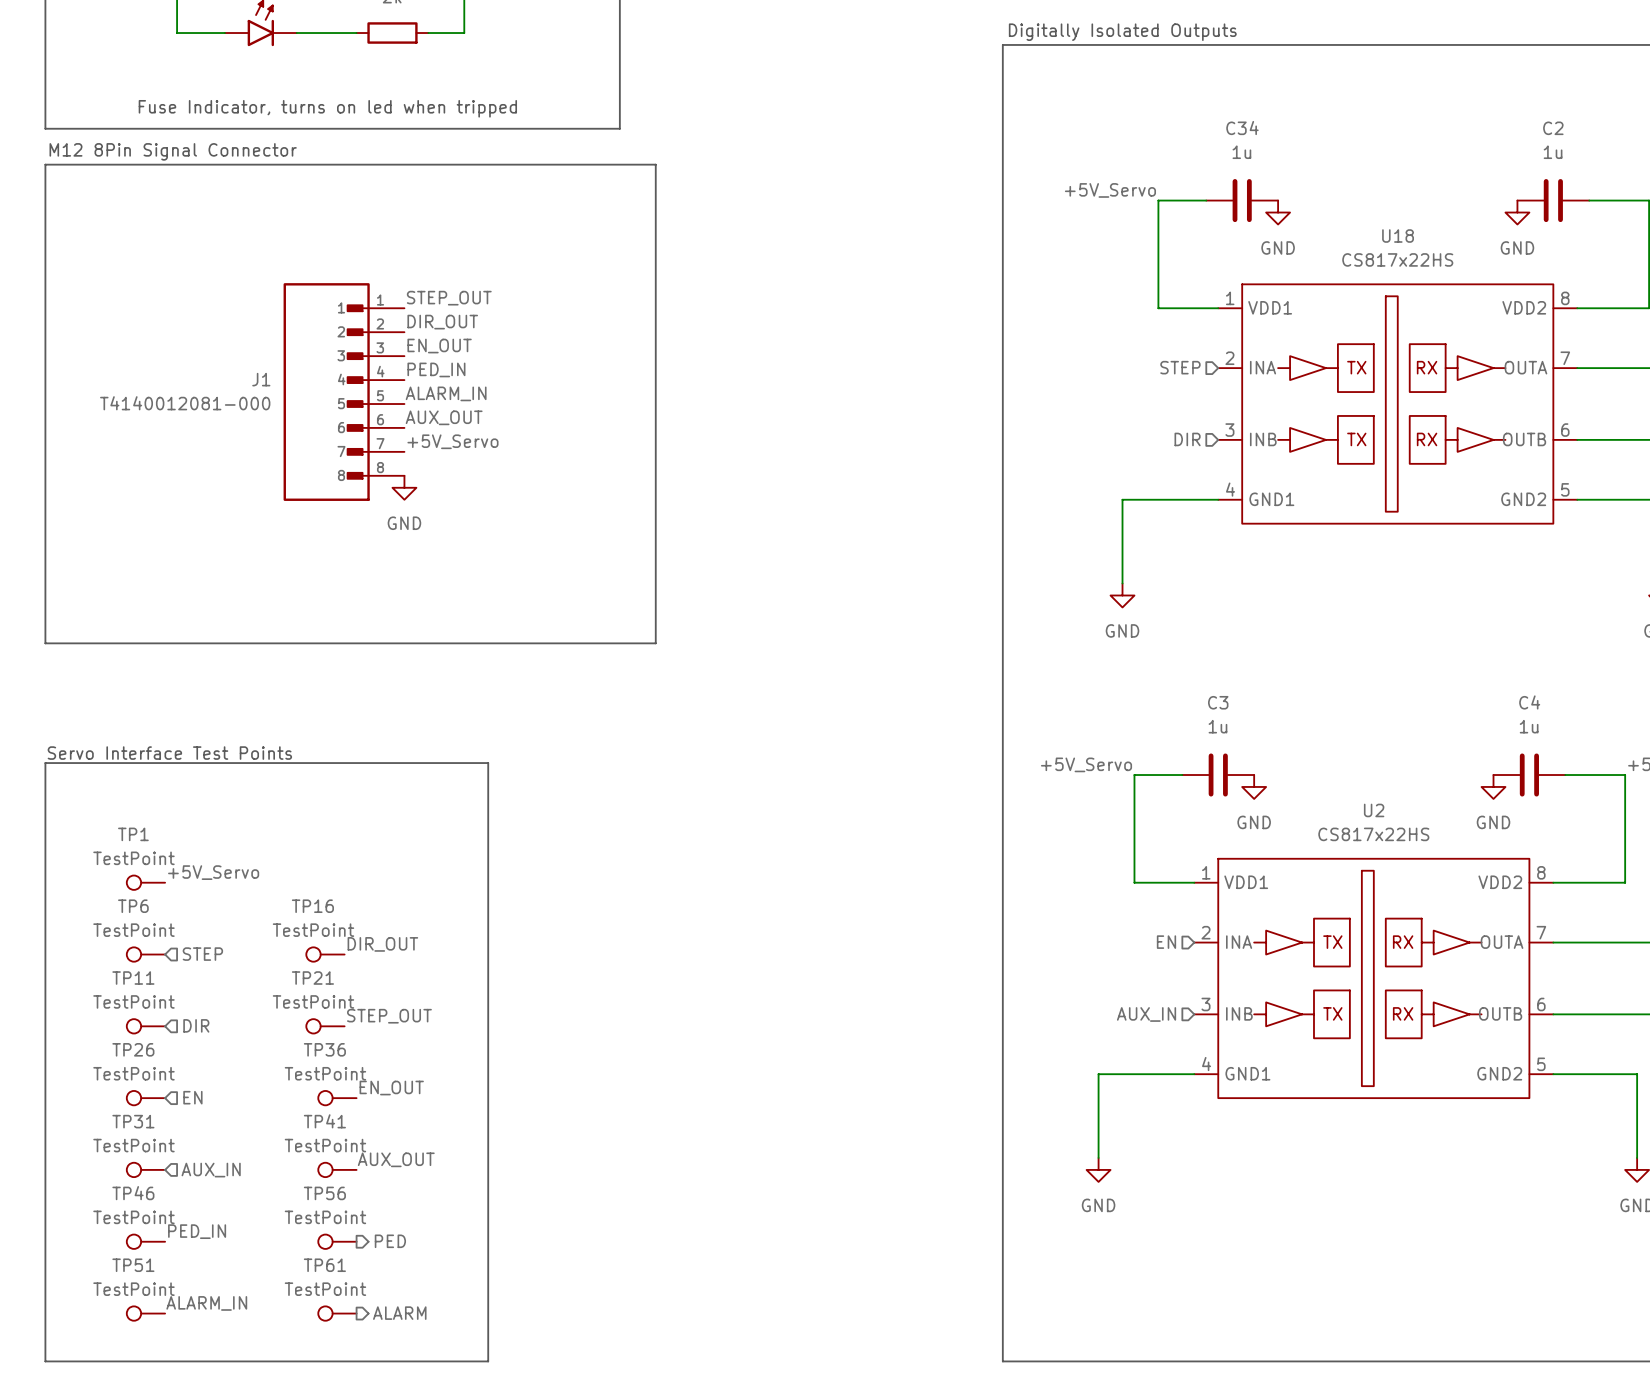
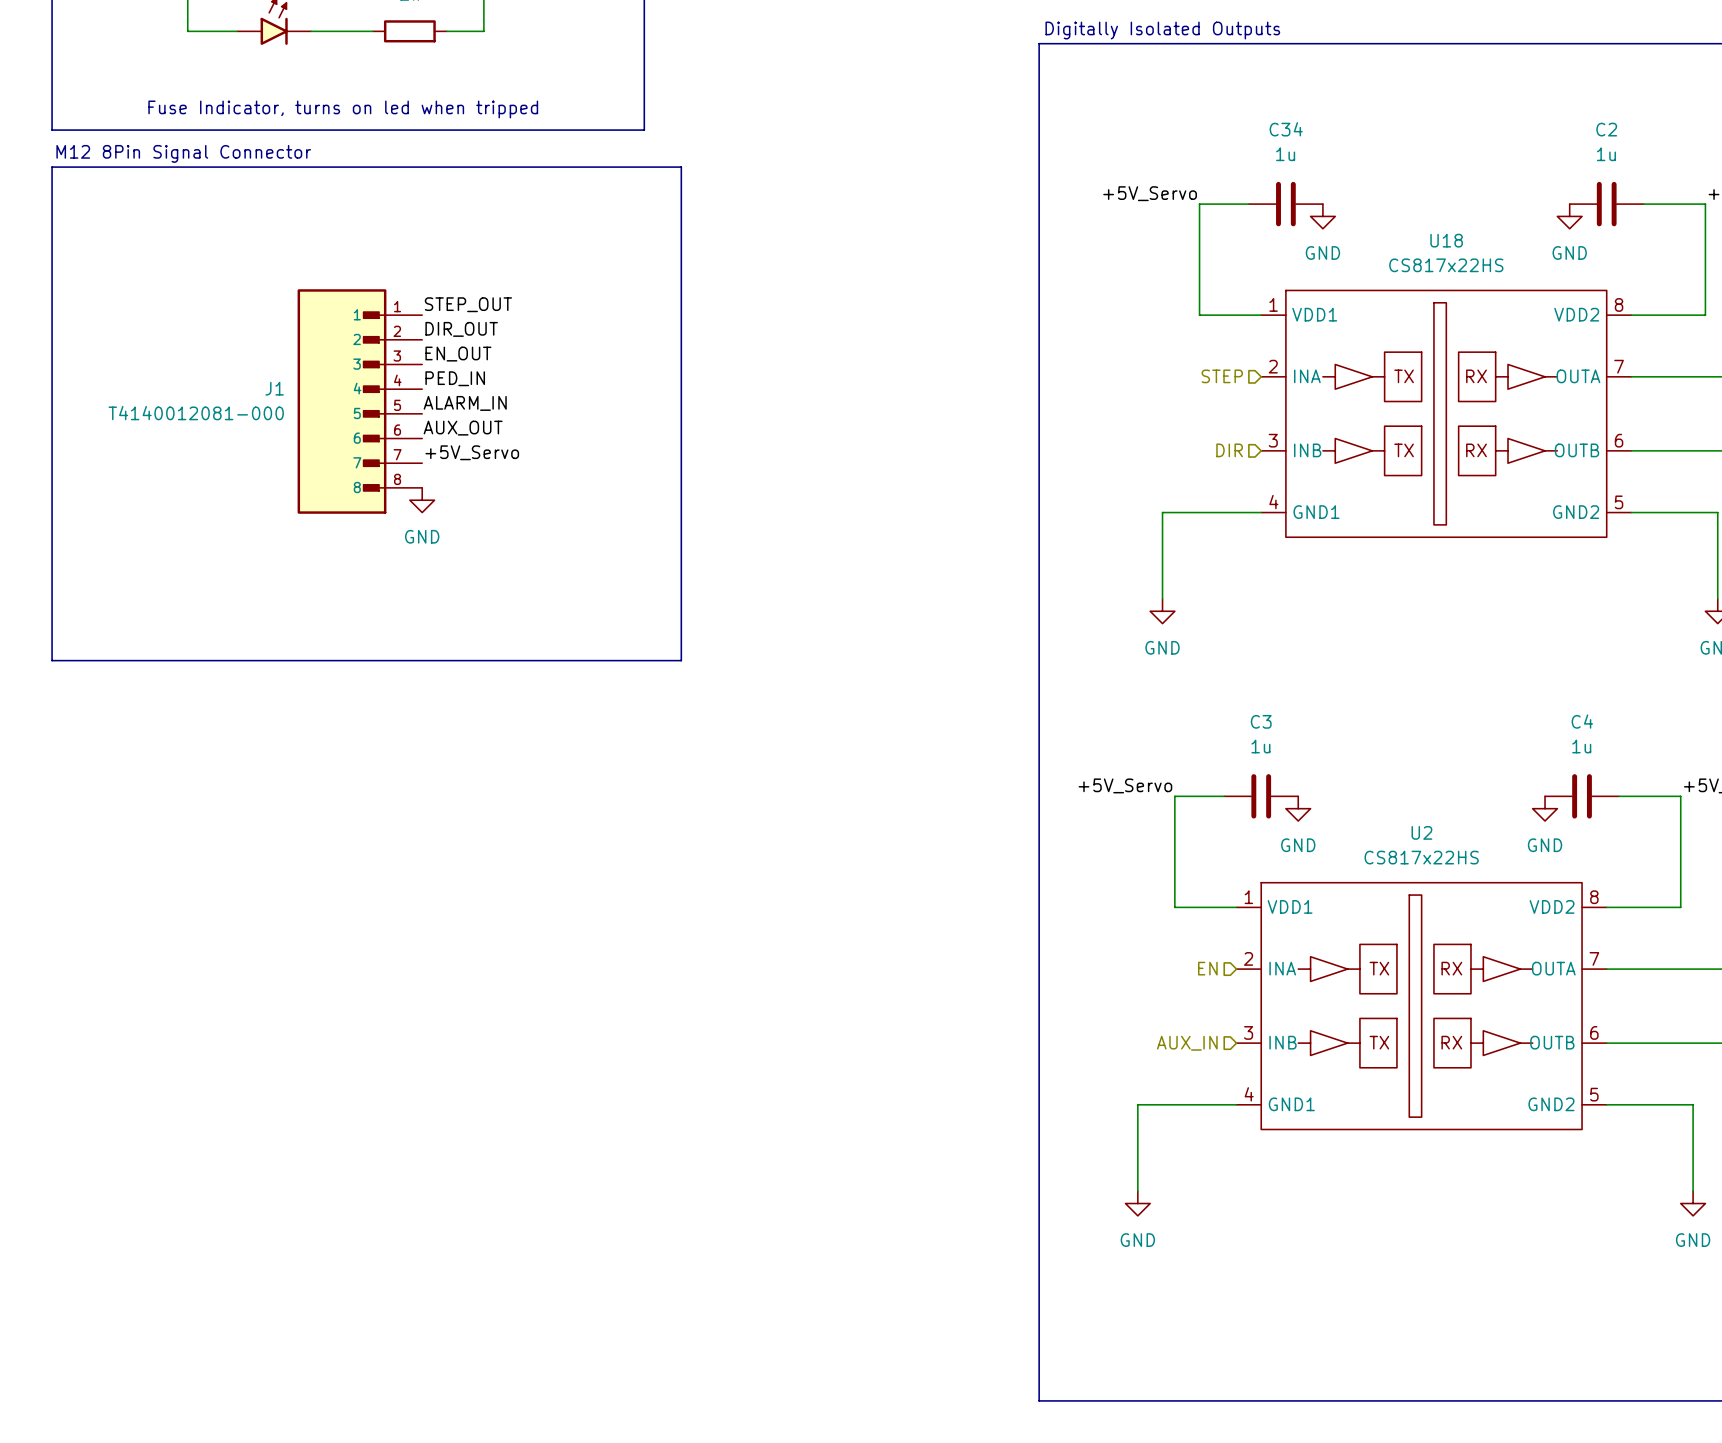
text: Servo Interface Test Points (169, 753) -> none
line: (45, 763) (488, 763) (488, 1361) (45, 1361) (45, 763) -> none
label: +5V_Servo (213, 872) -> none
TP1: TestPoint (145, 882) -> none
label: DIR_OUT (382, 944) -> none
TP6: TestPoint (145, 954) -> none
hierarchical label: STEP (202, 954) -> none
TP16: TestPoint (325, 954) -> none
label: STEP_OUT (389, 1016) -> none
hierarchical label: DIR (196, 1025) -> none
TP11: TestPoint (145, 1026) -> none
TP21: TestPoint (325, 1026) -> none
label: EN_OUT (391, 1088) -> none
hierarchical label: EN (192, 1097) -> none
TP26: TestPoint (145, 1098) -> none
TP36: TestPoint (337, 1098) -> none
label: AUX_OUT (396, 1159) -> none
TP31: TestPoint (145, 1169) -> none
TP41: TestPoint (337, 1169) -> none
hierarchical label: AUX_IN (211, 1170) -> none
label: PED_IN (197, 1231) -> none
TP46: TestPoint (145, 1241) -> none
TP56: TestPoint (337, 1241) -> none
hierarchical label: PED (390, 1241) -> none
label: ALARM_IN (206, 1303) -> none
TP51: TestPoint (145, 1313) -> none
TP61: TestPoint (337, 1313) -> none
hierarchical label: ALARM (399, 1313) -> none

